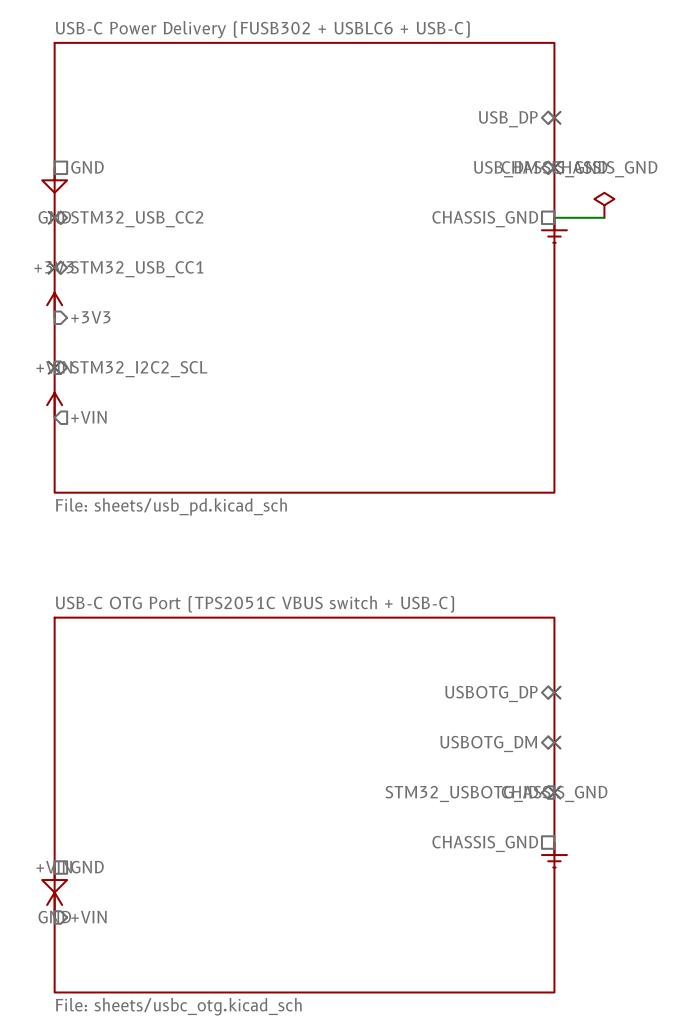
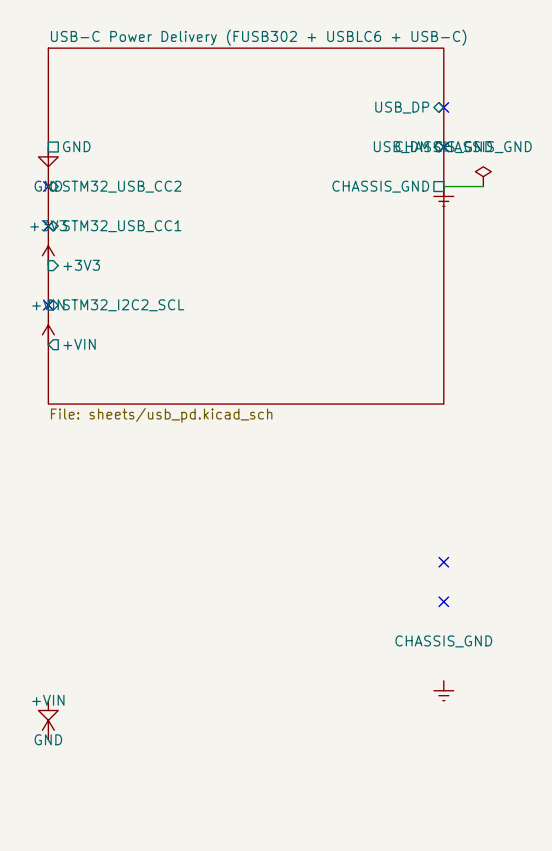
sheet pin: USBOTG_DP (491, 694) -> none
sheet pin: USBOTG_DM (488, 743) -> none
no-connect mark: (554, 792) -> none
sheet pin: STM32_USBOTG_ID (461, 793) -> none
sheet USB-C OTG Port (TPS2051C VBUS switch + USB-C): File: sheets/usbc_otg.kicad_sch (304, 805) -> none
sheet pin: CHASSIS_GND (485, 843) -> none
sheet pin: GND (87, 867) -> none
sheet pin: +VIN (88, 917) -> none

